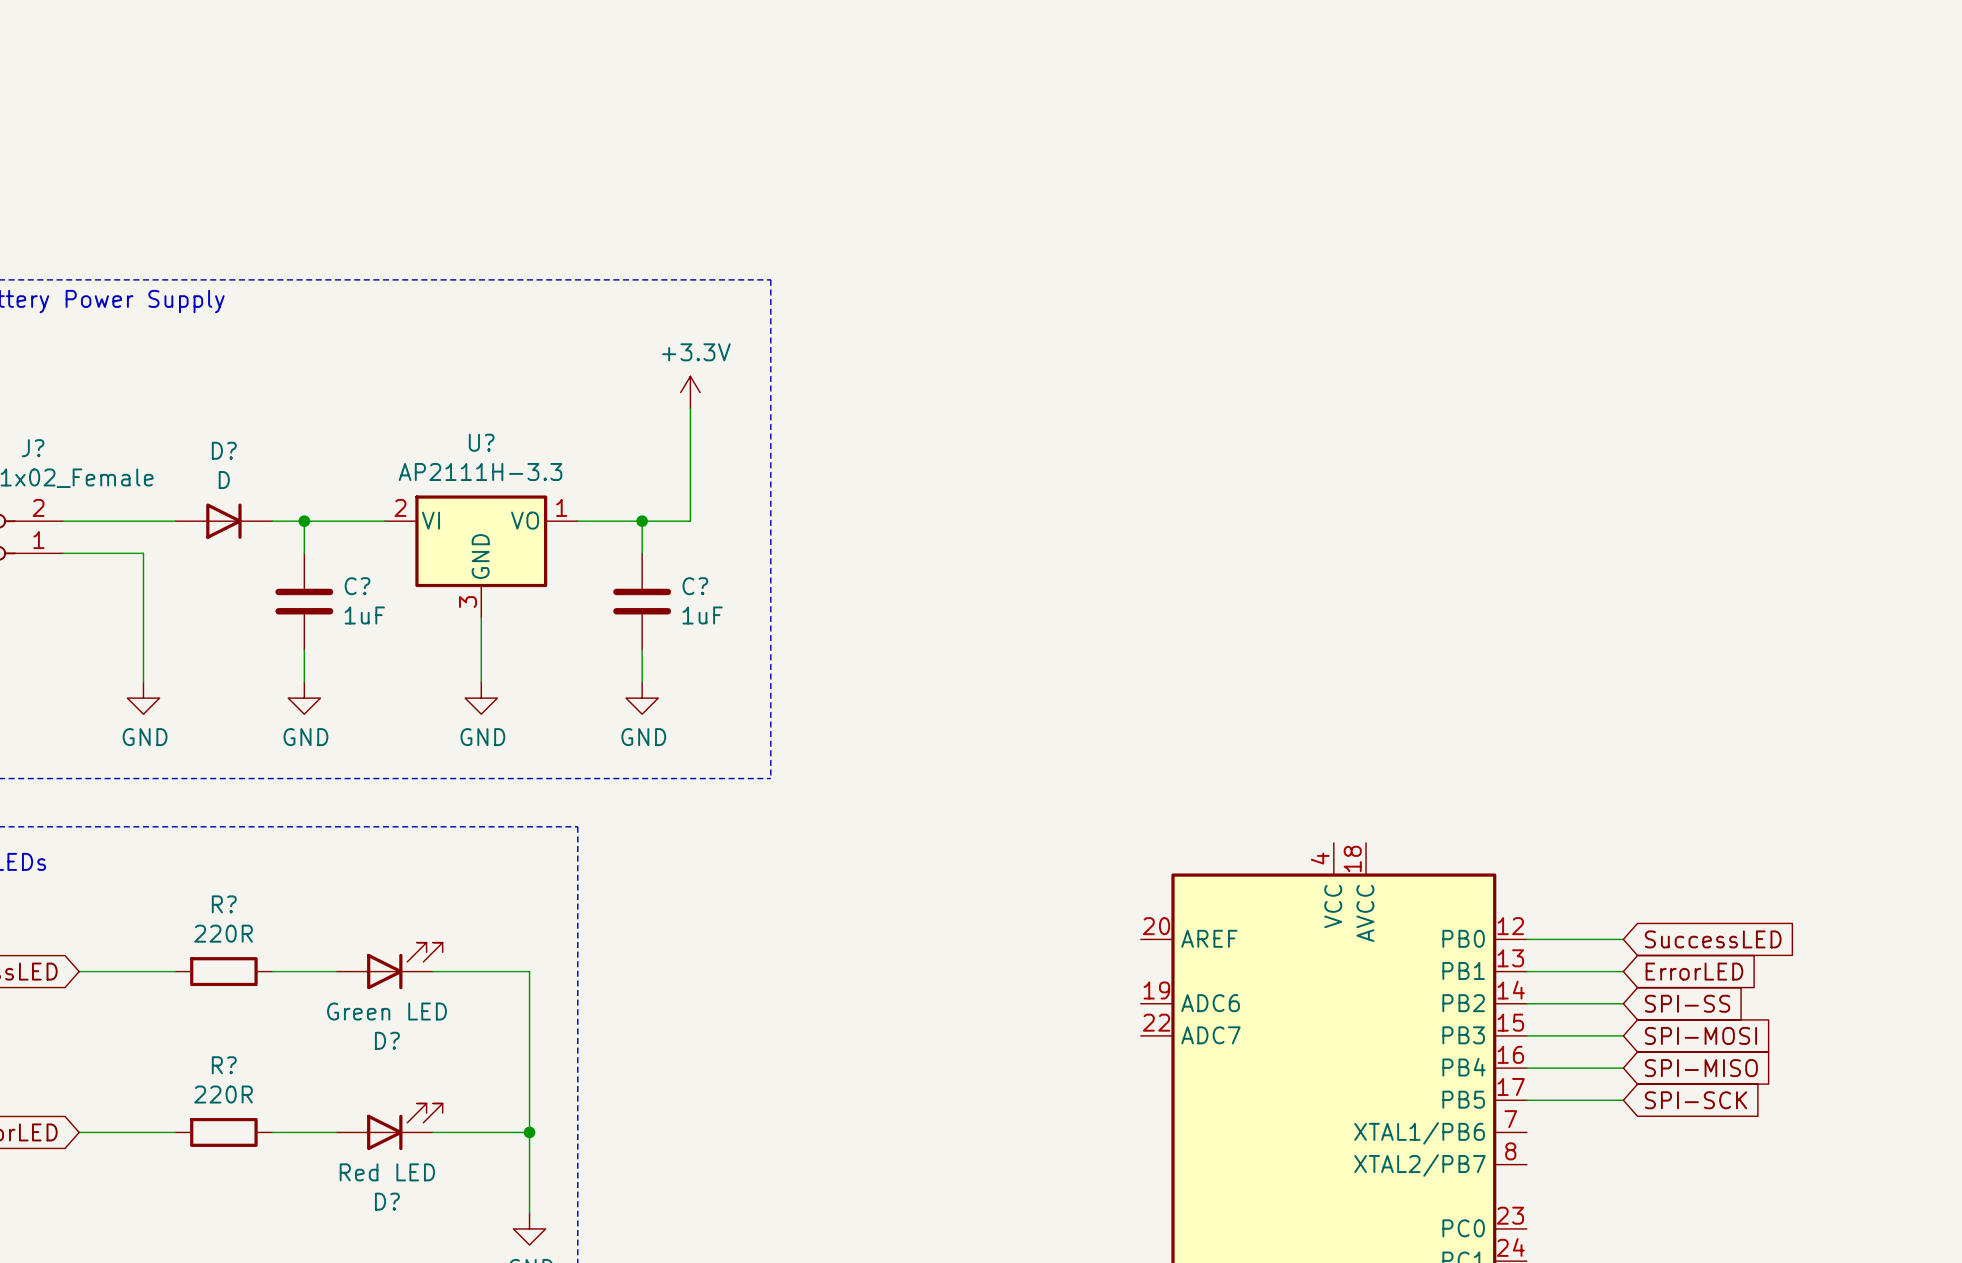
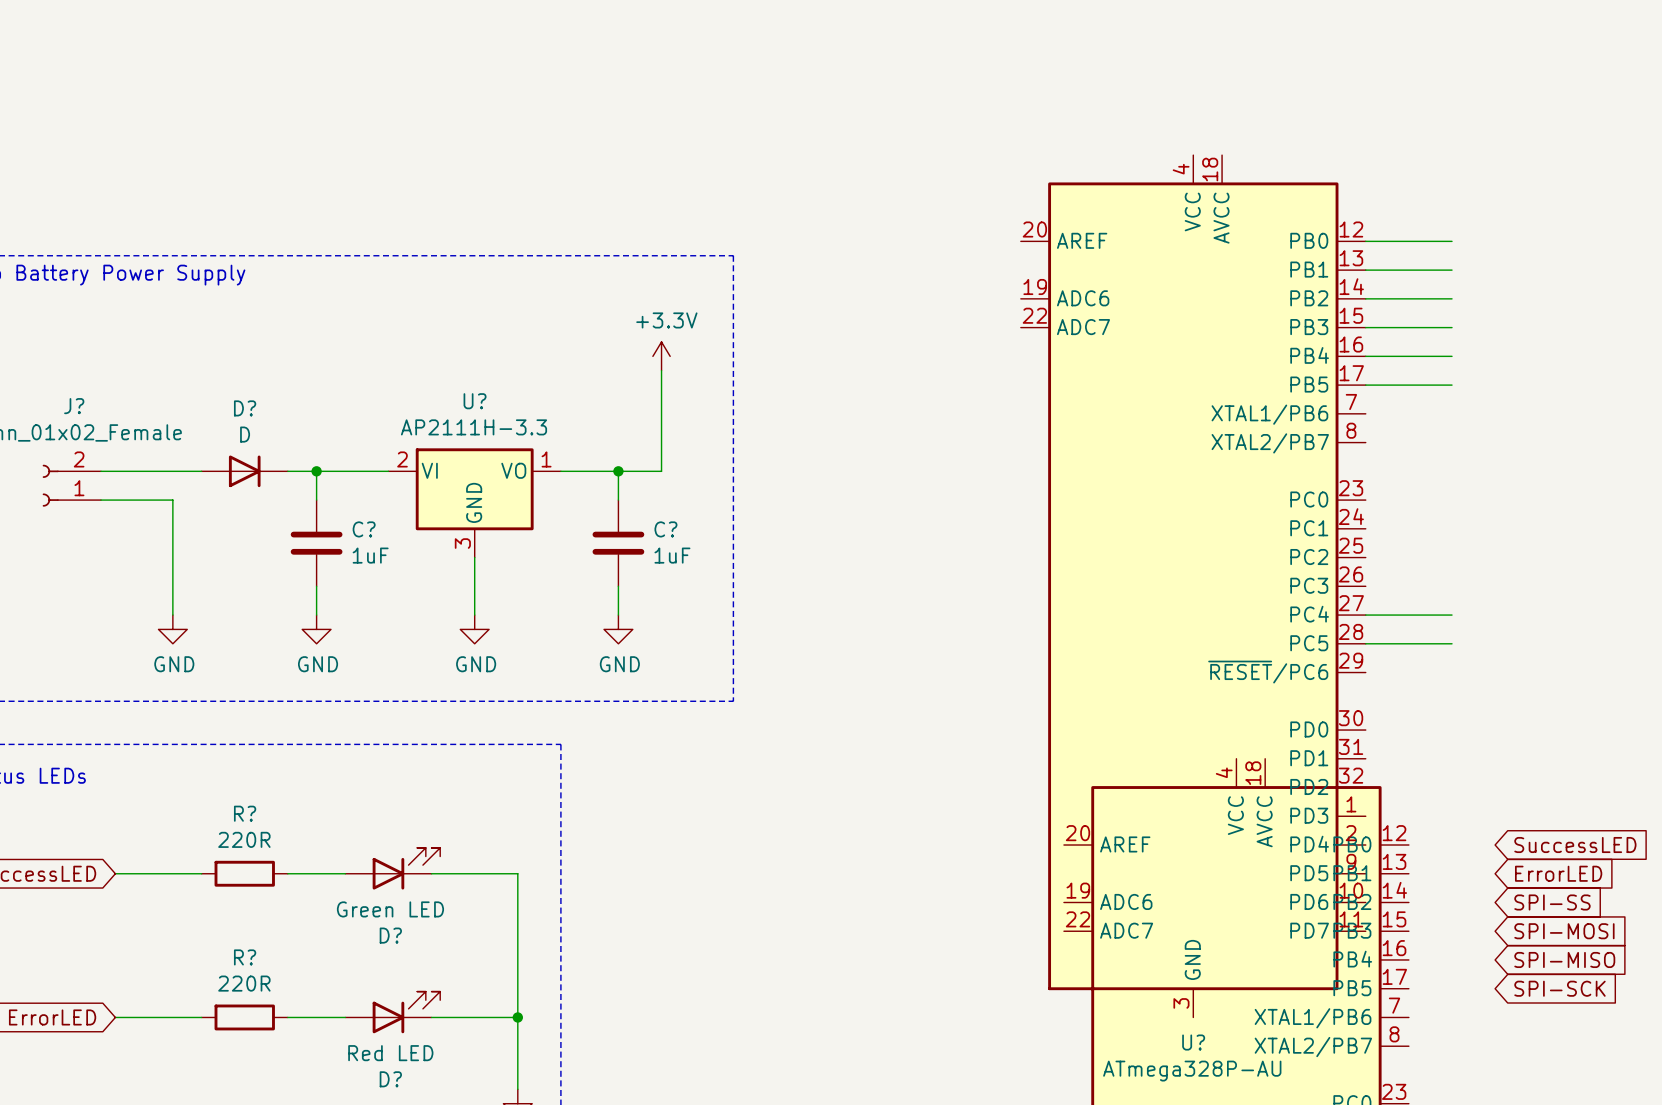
wire: none -> (1365, 241) (1452, 241)
wire: none -> (1365, 270) (1452, 270)
wire: none -> (1365, 298) (1452, 298)
wire: none -> (1365, 327) (1452, 327)
wire: none -> (1365, 356) (1452, 356)
wire: none -> (1365, 385) (1452, 385)
U?: none -> ATmega328P-AU (1193, 586)
wire: (1526, 939) (1623, 939) -> (1365, 615) (1452, 615)
wire: (1526, 971) (1623, 971) -> (1365, 643) (1452, 643)
wire: (1526, 1003) (1623, 1003) -> none
wire: (1526, 1035) (1623, 1035) -> none
wire: (1526, 1068) (1623, 1068) -> none
wire: (1526, 1100) (1623, 1100) -> none

